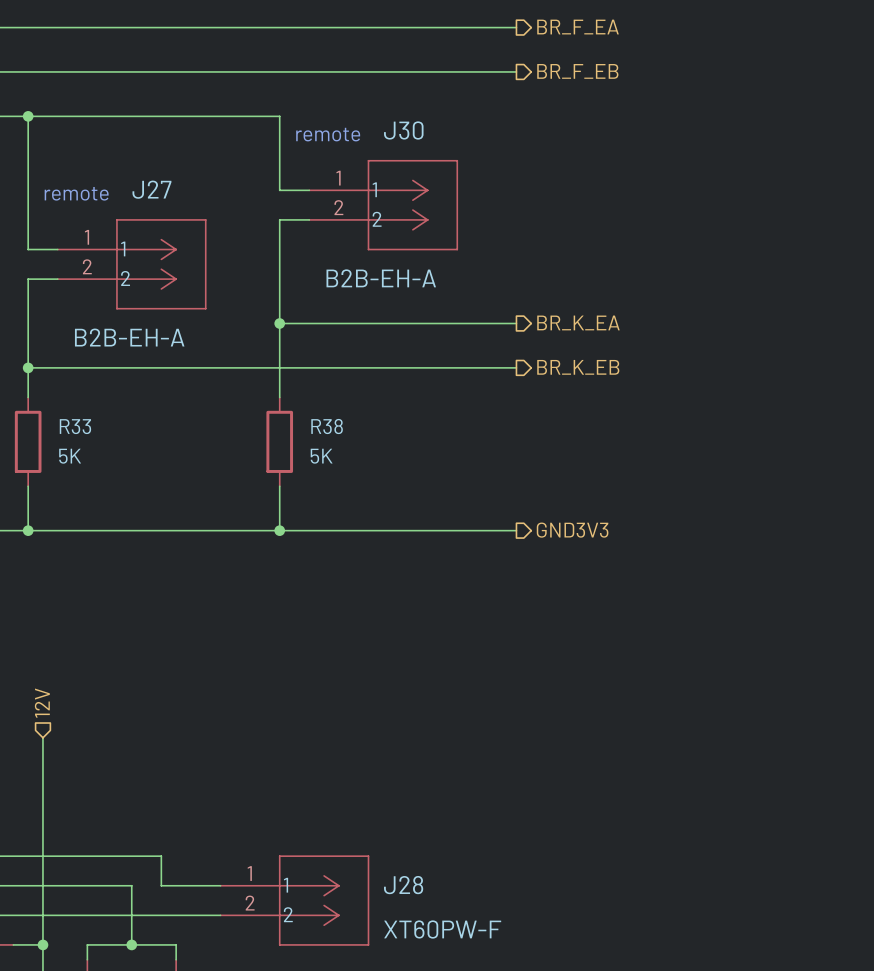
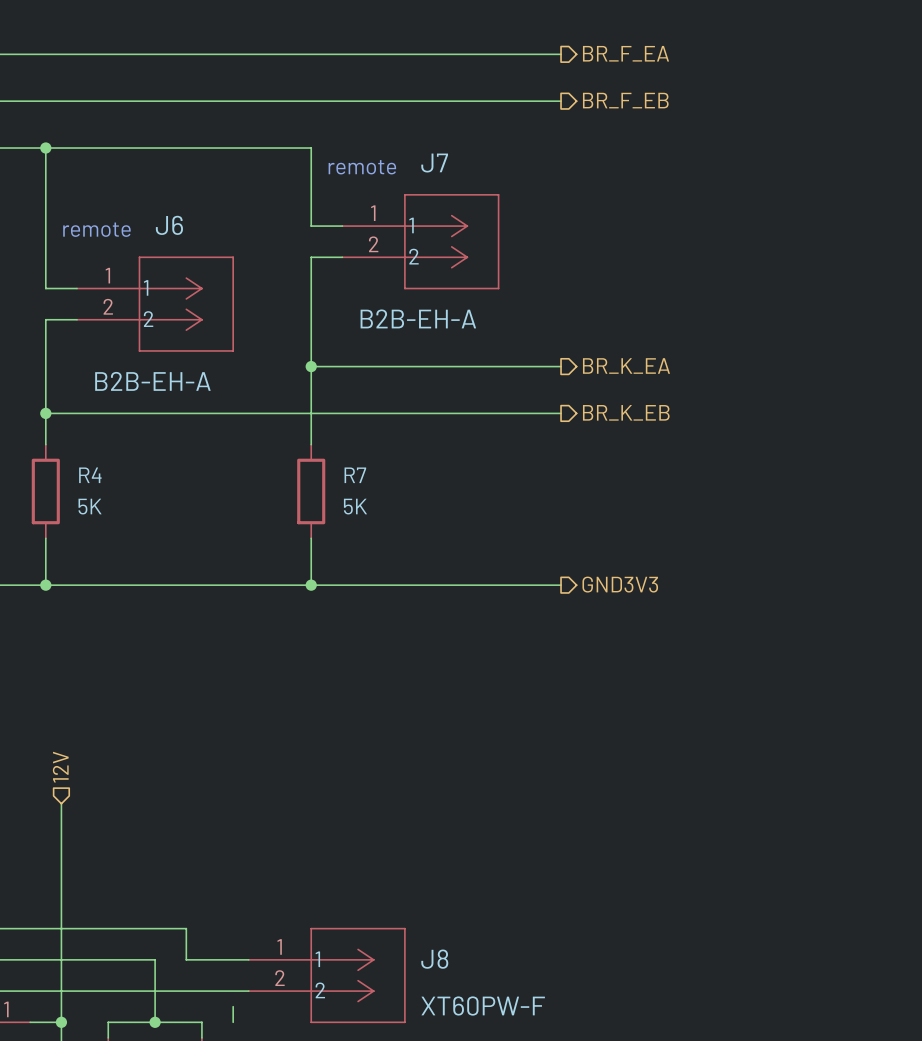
J30 name: J30 (403, 130) -> J7 (434, 163)
J27 name: J27 (151, 189) -> J6 (169, 225)
R33 name: R33 (75, 426) -> R4 (90, 475)
R38 name: R38 (327, 426) -> R7 (355, 475)
J28 name: J28 (403, 885) -> J8 (434, 959)
wire: none -> (233, 1006) (233, 1022)

